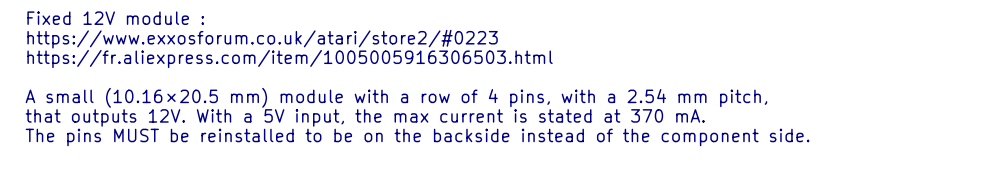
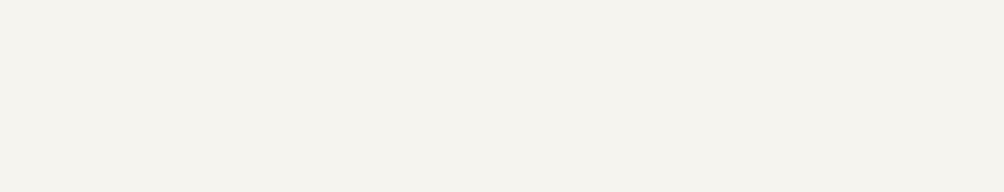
text: Fixed 12V module : (115, 18) -> none
text: https://www.exxosforum.co.uk/atari/store2/#0223 (262, 39) -> none
text: https://fr.aliexpress.com/item/1005005916306503.html (290, 59) -> none
text: A small (10.16×20.5 mm) module with a row of 4 pins, with a 2.54 mm pitch, (396, 97) -> none
text: that outputs 12V. With a 5V input, the max current is stated at 370 mA. (365, 117) -> none
text: The pins MUST be reinstalled to be on the backside instead of the component side. (417, 137) -> none

